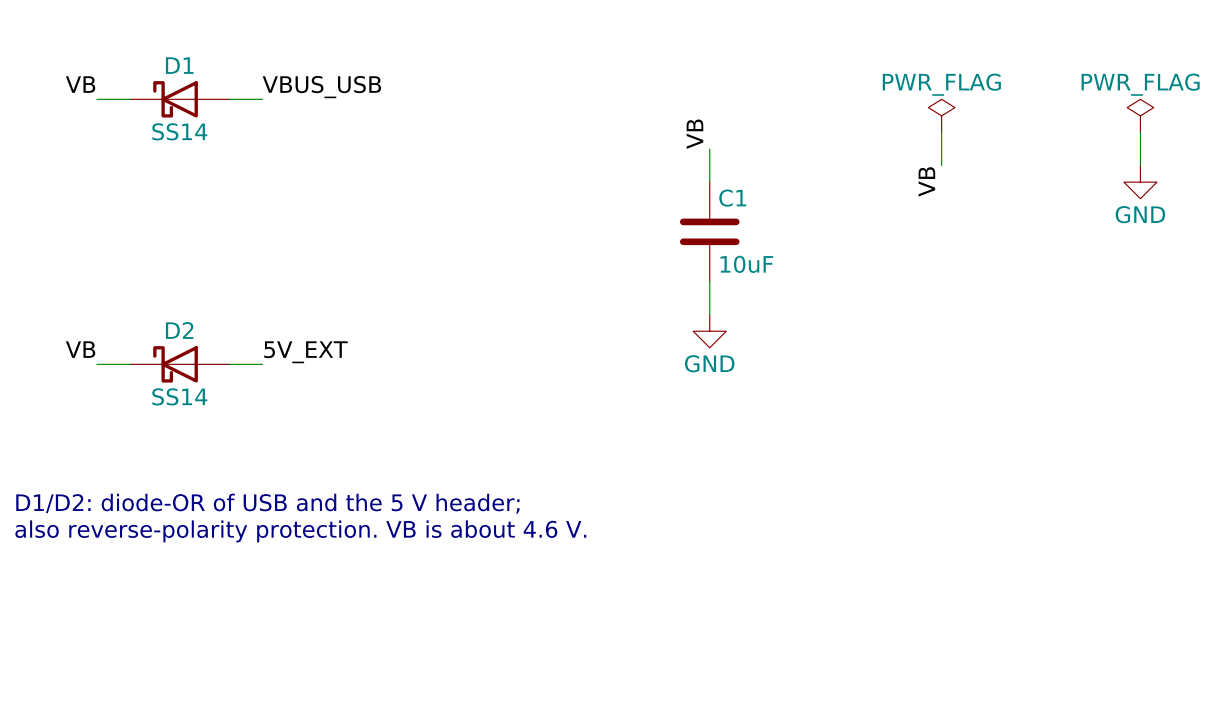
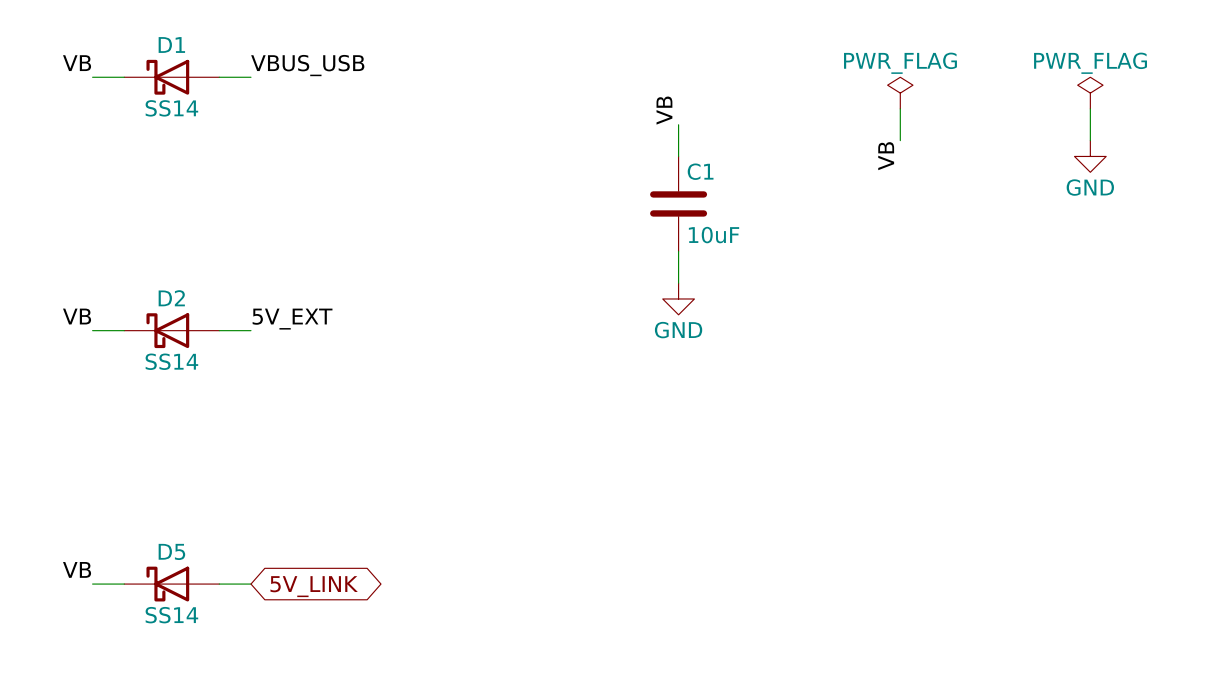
text: D1/D2: diode-OR of USB and the 5 V header; (267, 503) -> none
text: also reverse-polarity protection. VB is about 4.6 V. (300, 531) -> none
label: none -> VB (77, 569)
wire: none -> (92, 584) (124, 584)
D5: none -> SS14 (171, 584)
wire: none -> (219, 584) (250, 584)
global label: none -> 5V_LINK (314, 586)

